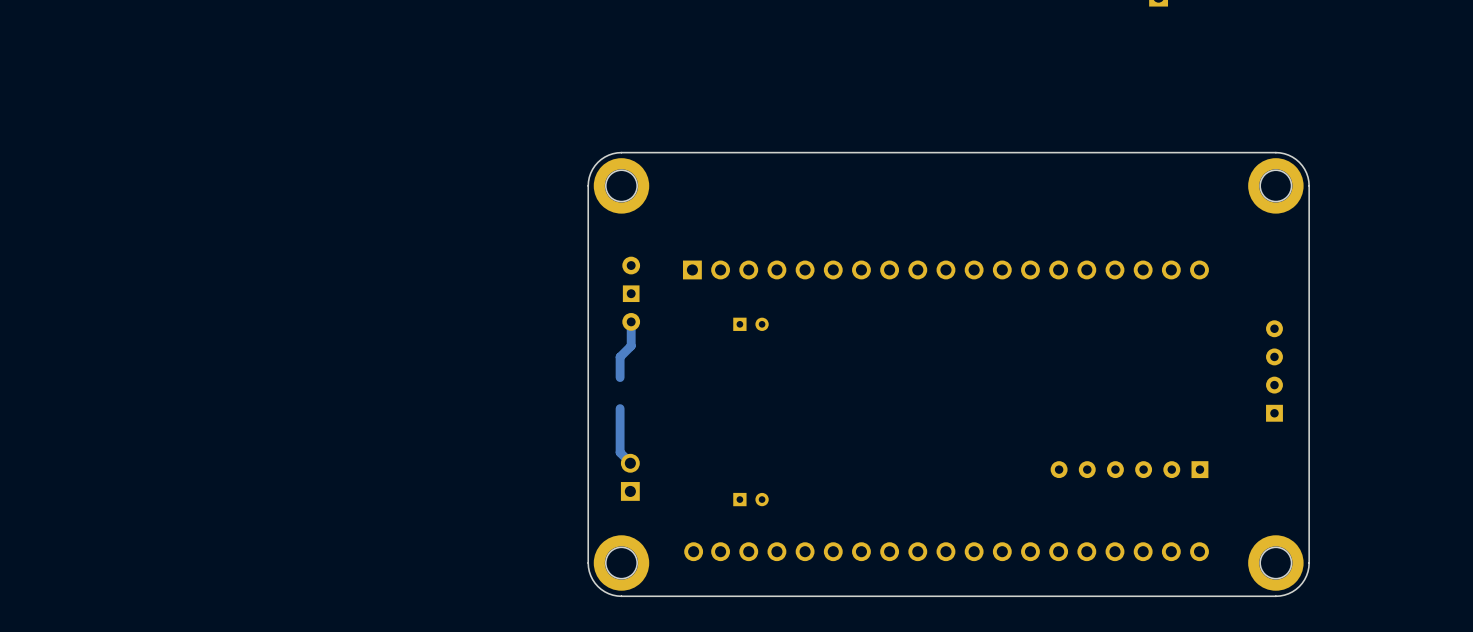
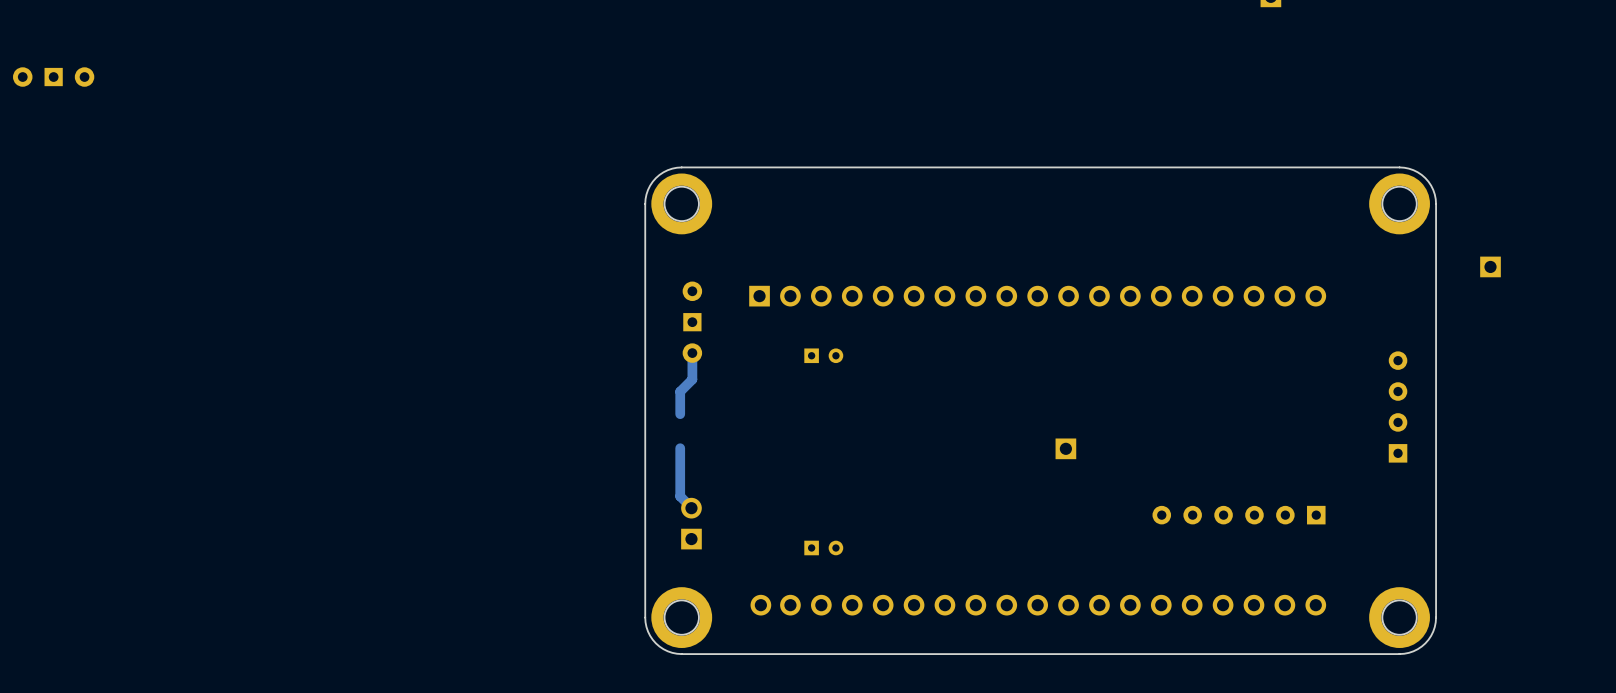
part: none -> (53, 77)
part: none -> (1490, 266)
part: none -> (1065, 448)

